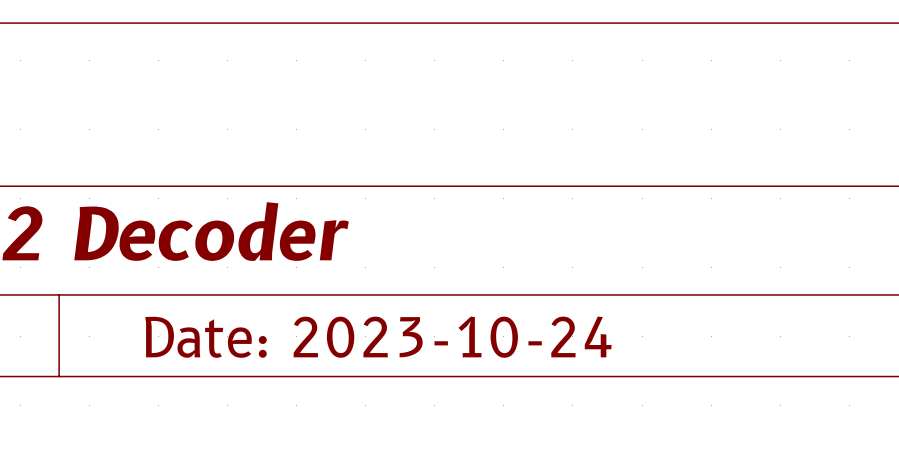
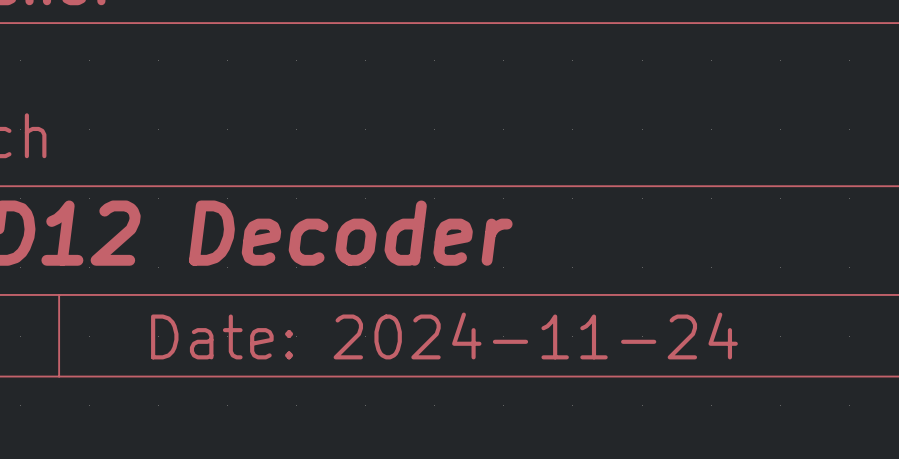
title block: Date: 2023-10-24 (378, 337) -> Date: 2024-11-24 (444, 335)

